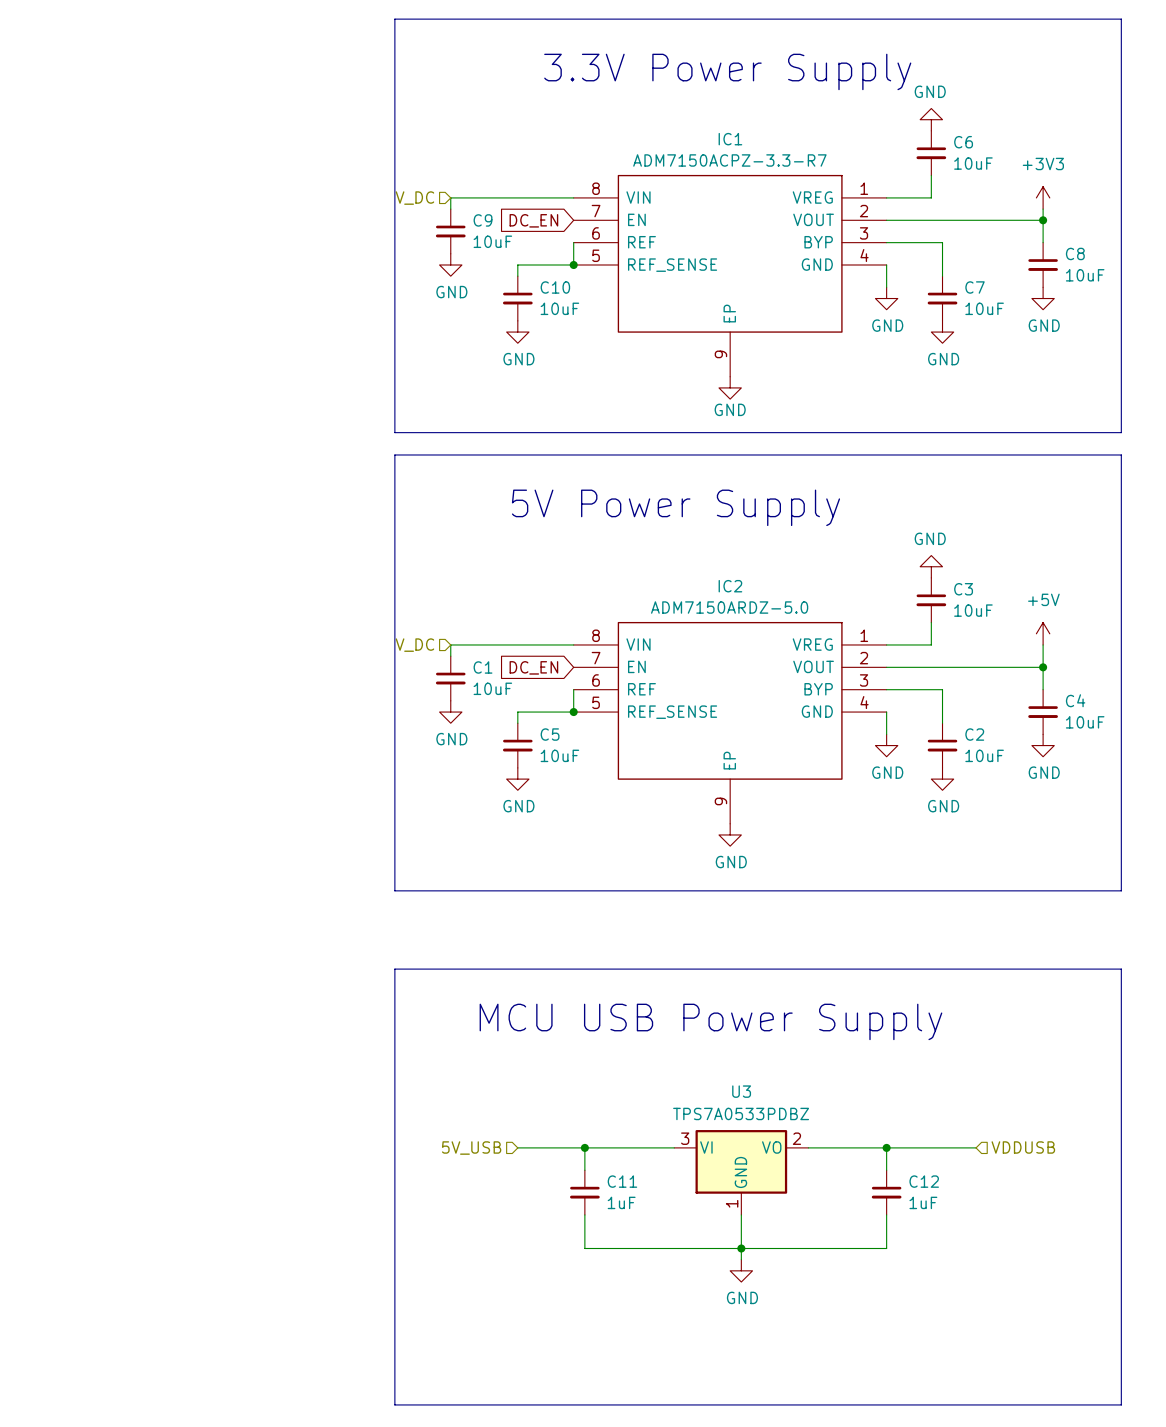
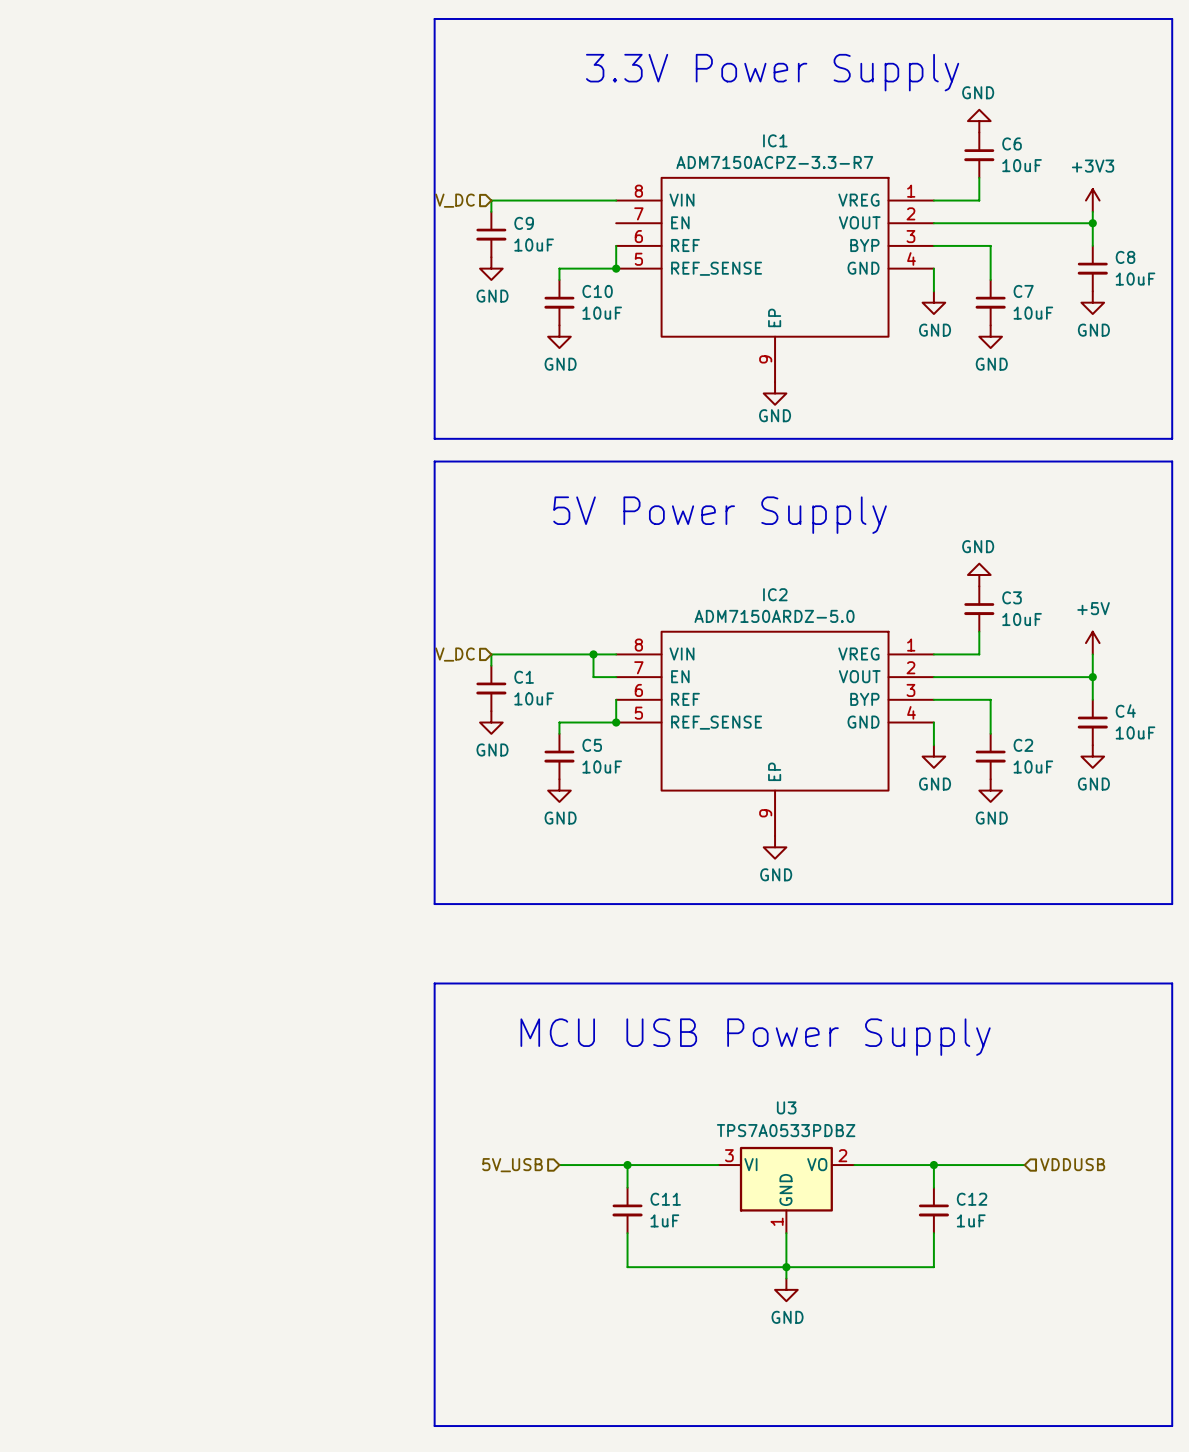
global label: DC_EN (533, 220) -> none
wire: none -> (593, 654) (593, 677) (616, 677)
junction: none -> (593, 654)
global label: DC_EN (533, 667) -> none

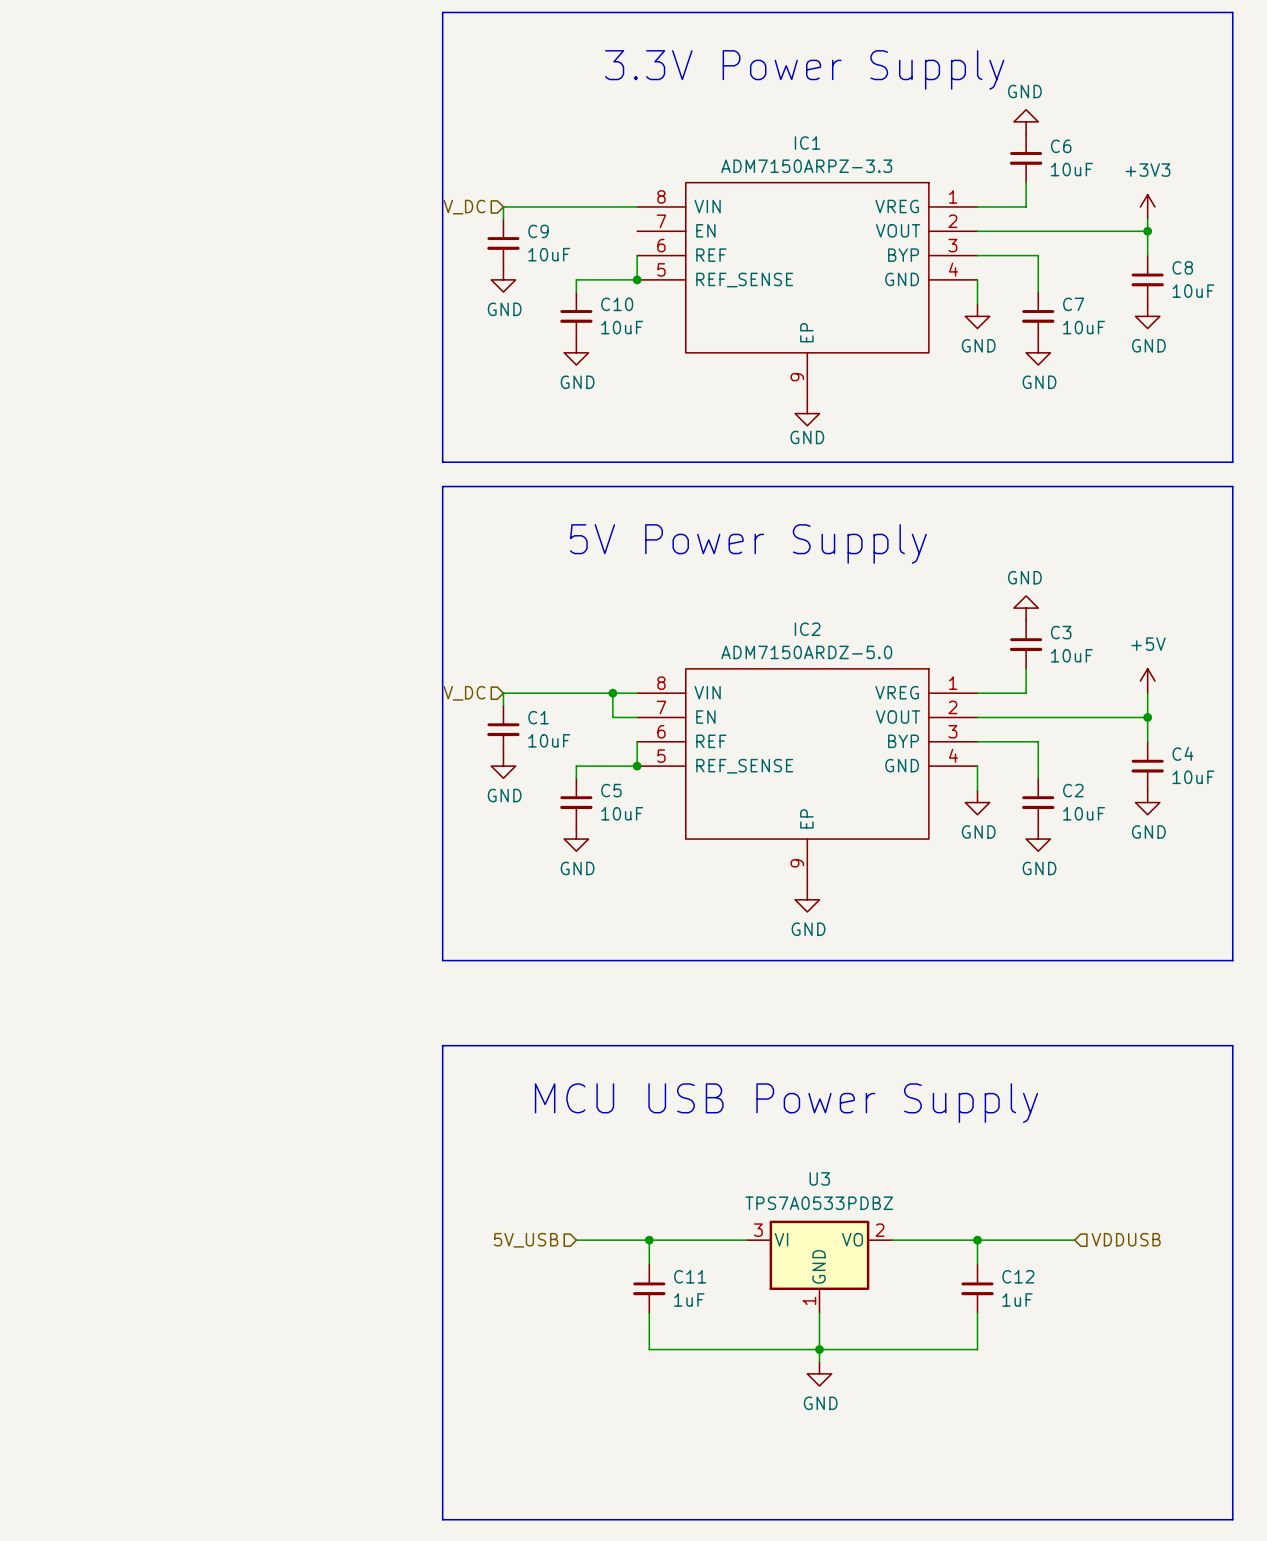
IC1 value: ADM7150ACPZ-3.3-R7 (774, 162) -> ADM7150ARPZ-3.3 (806, 166)

